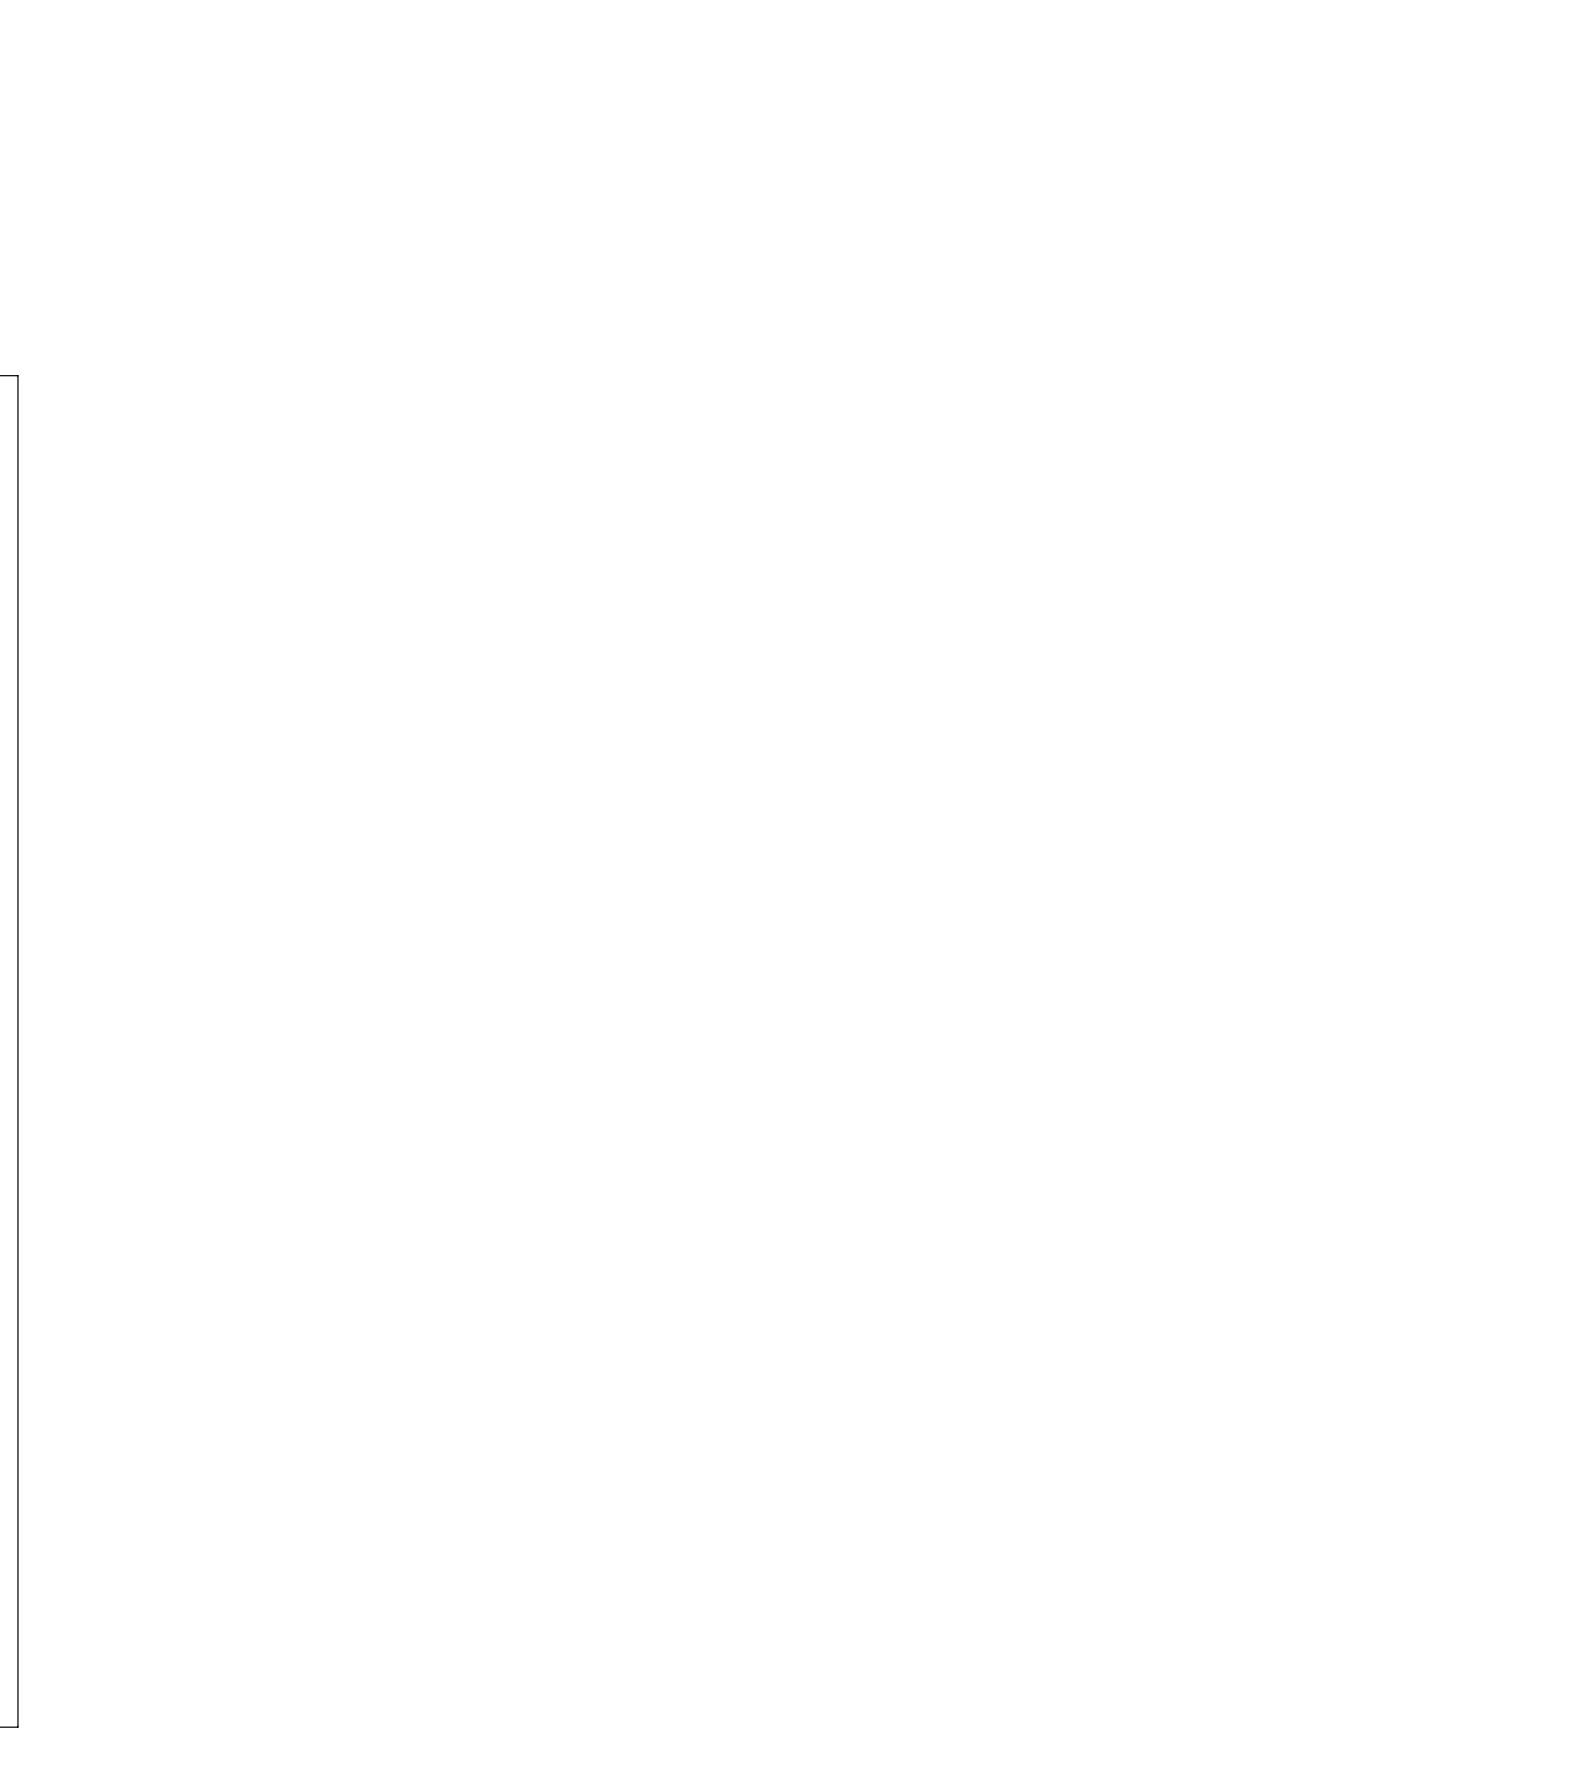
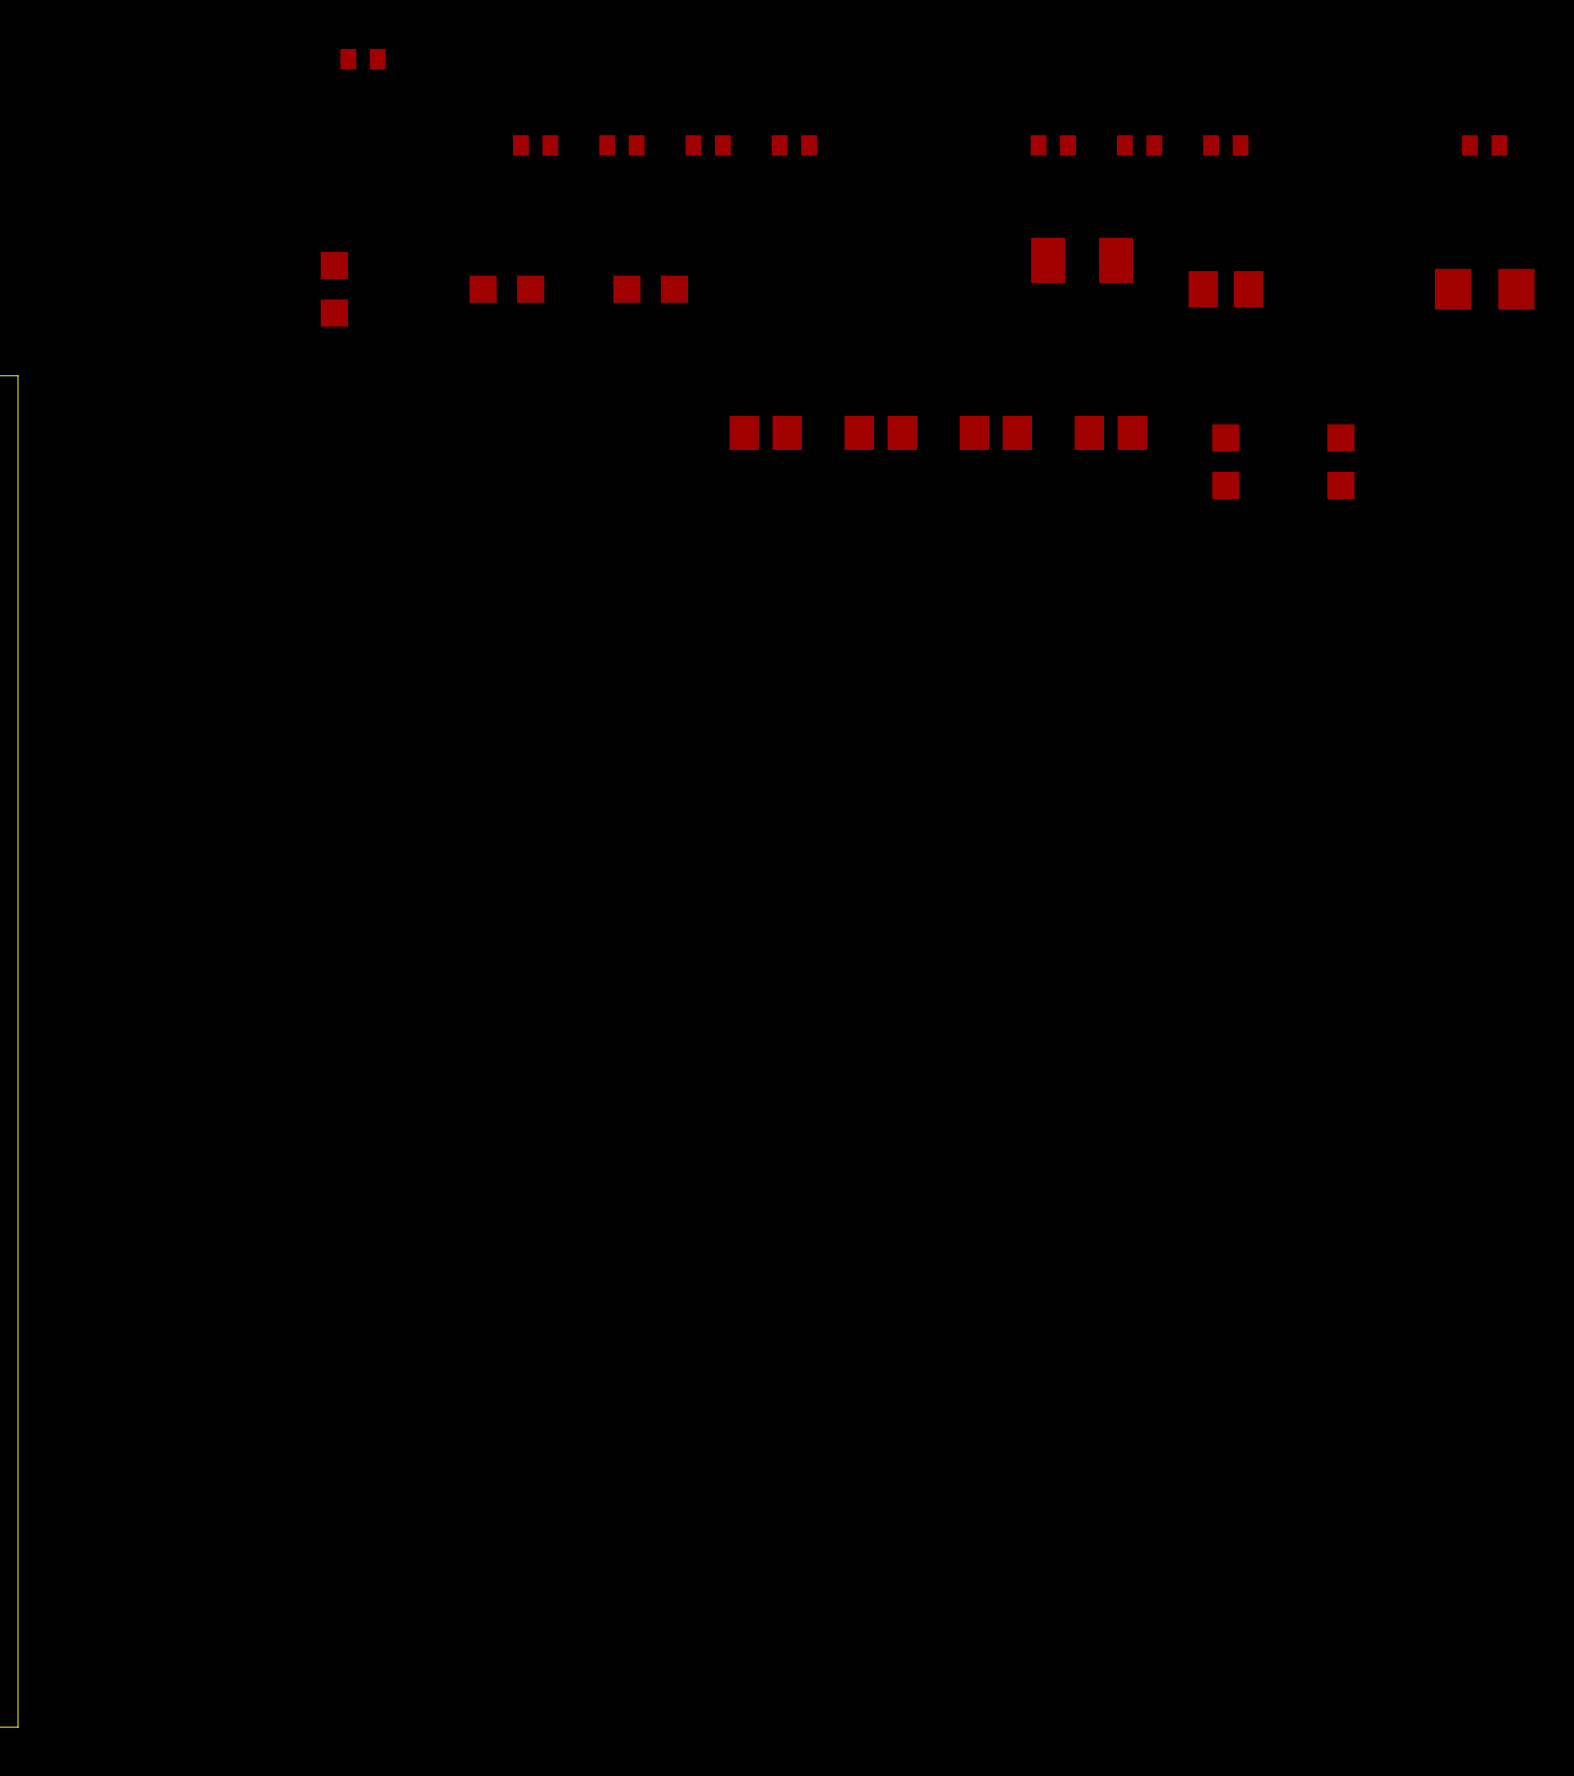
part: none -> (363, 59)
part: none -> (535, 145)
part: none -> (621, 145)
part: none -> (708, 145)
part: none -> (794, 145)
part: none -> (1053, 145)
part: none -> (1139, 145)
part: none -> (1225, 145)
part: none -> (1484, 145)
part: none -> (1082, 260)
part: none -> (334, 289)
part: none -> (506, 289)
part: none -> (650, 289)
part: none -> (1225, 289)
part: none -> (1484, 289)
part: none -> (765, 432)
part: none -> (880, 432)
part: none -> (995, 432)
part: none -> (1110, 432)
part: none -> (1225, 461)
part: none -> (1340, 461)

